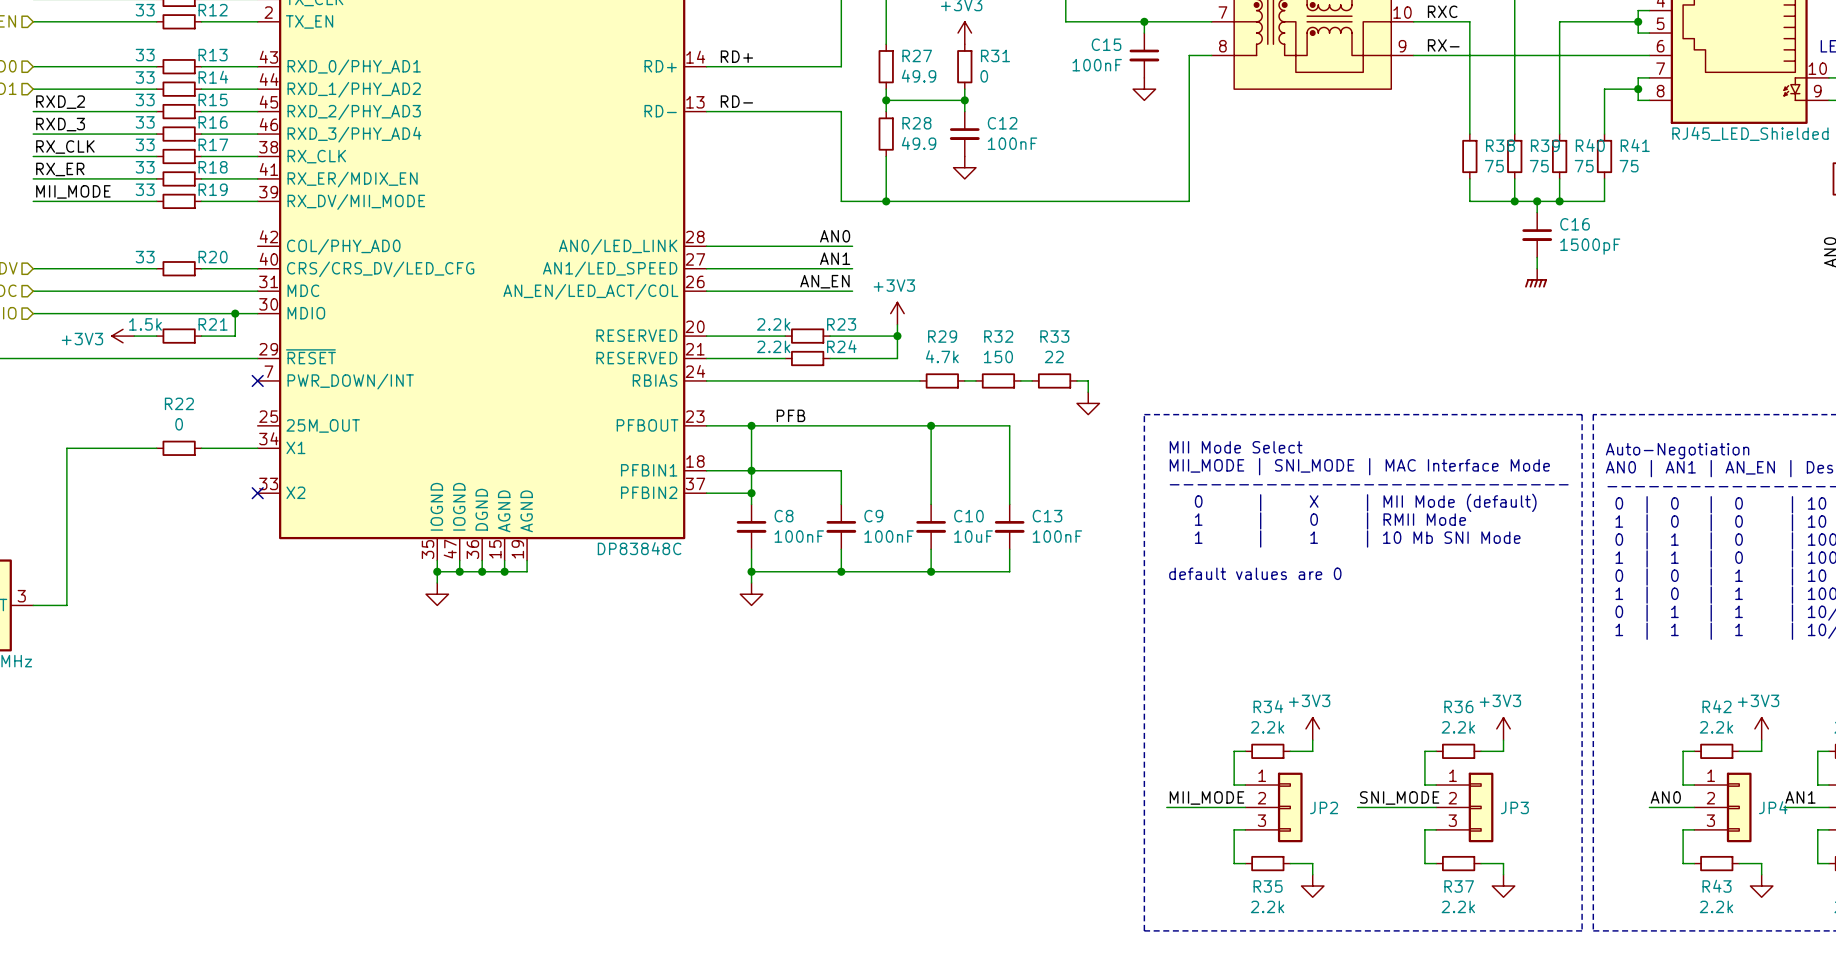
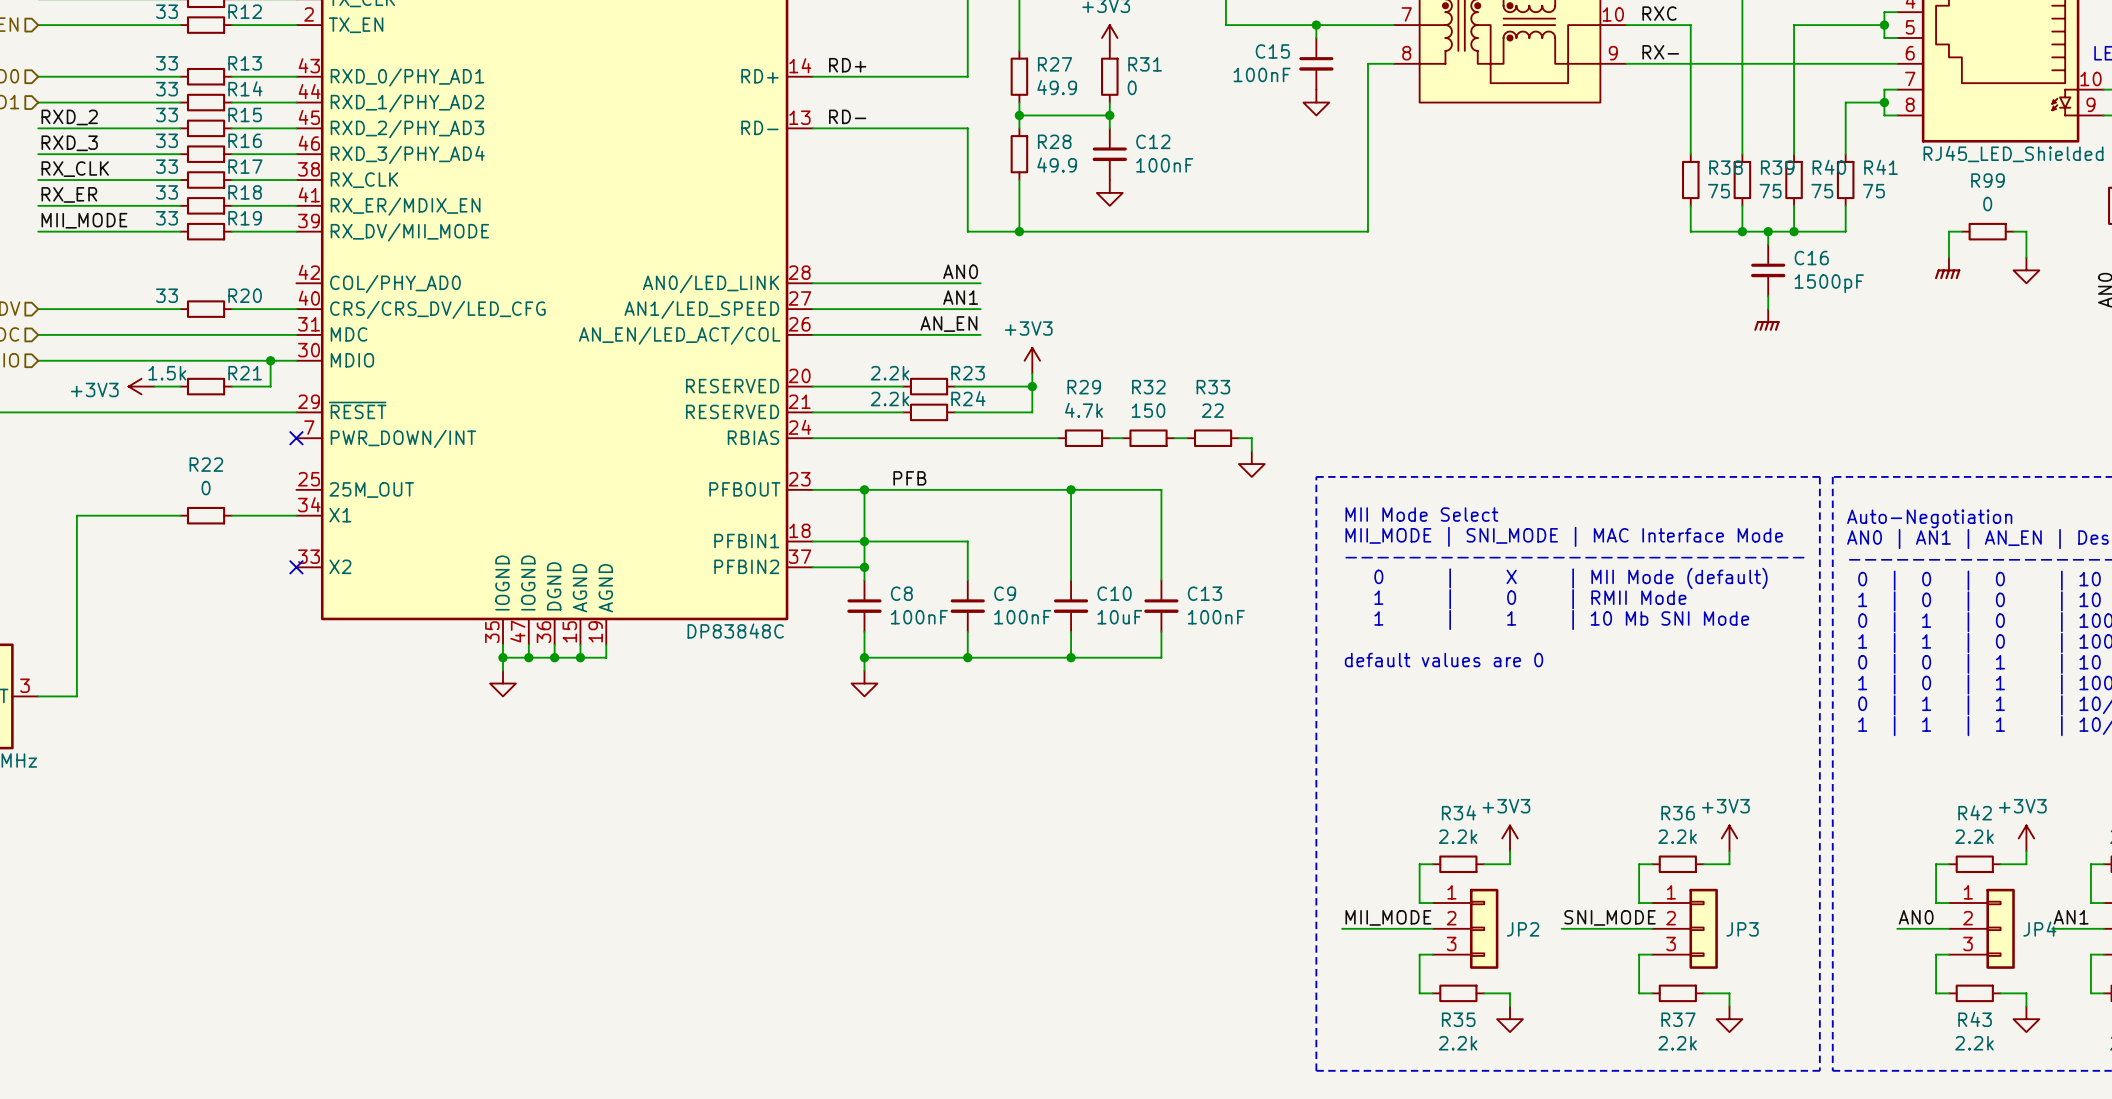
wire: none -> (1961, 231) (1948, 231) (1948, 257)
R99: none -> 0 (1987, 231)
wire: none -> (2013, 231) (2026, 231) (2026, 257)
power symbol: none -> (1947, 268)
power symbol: none -> (2026, 270)

